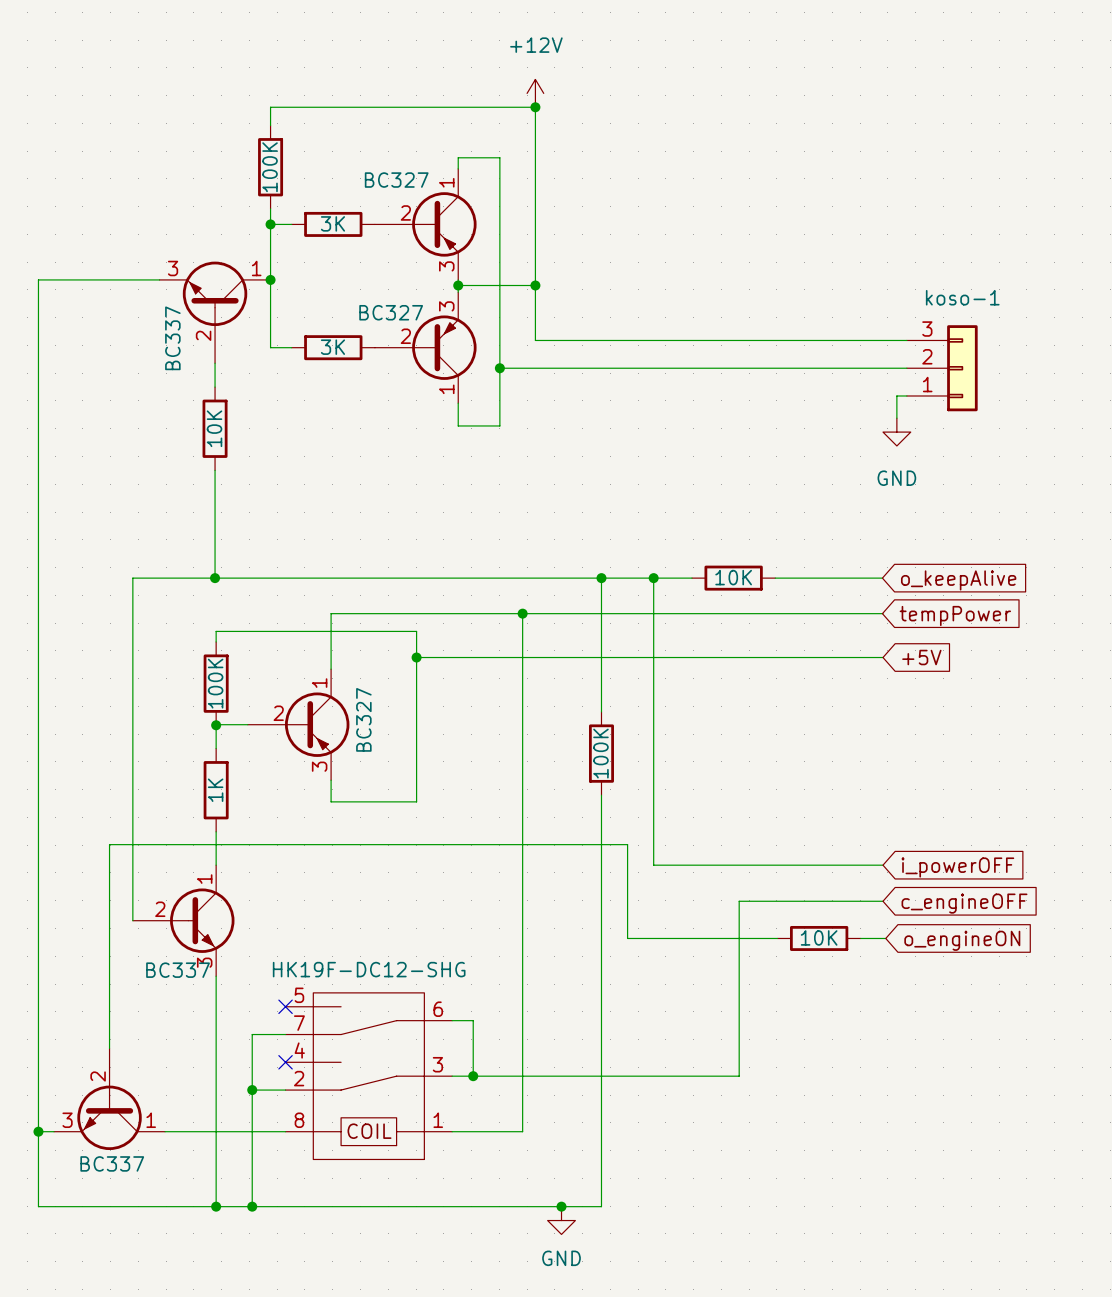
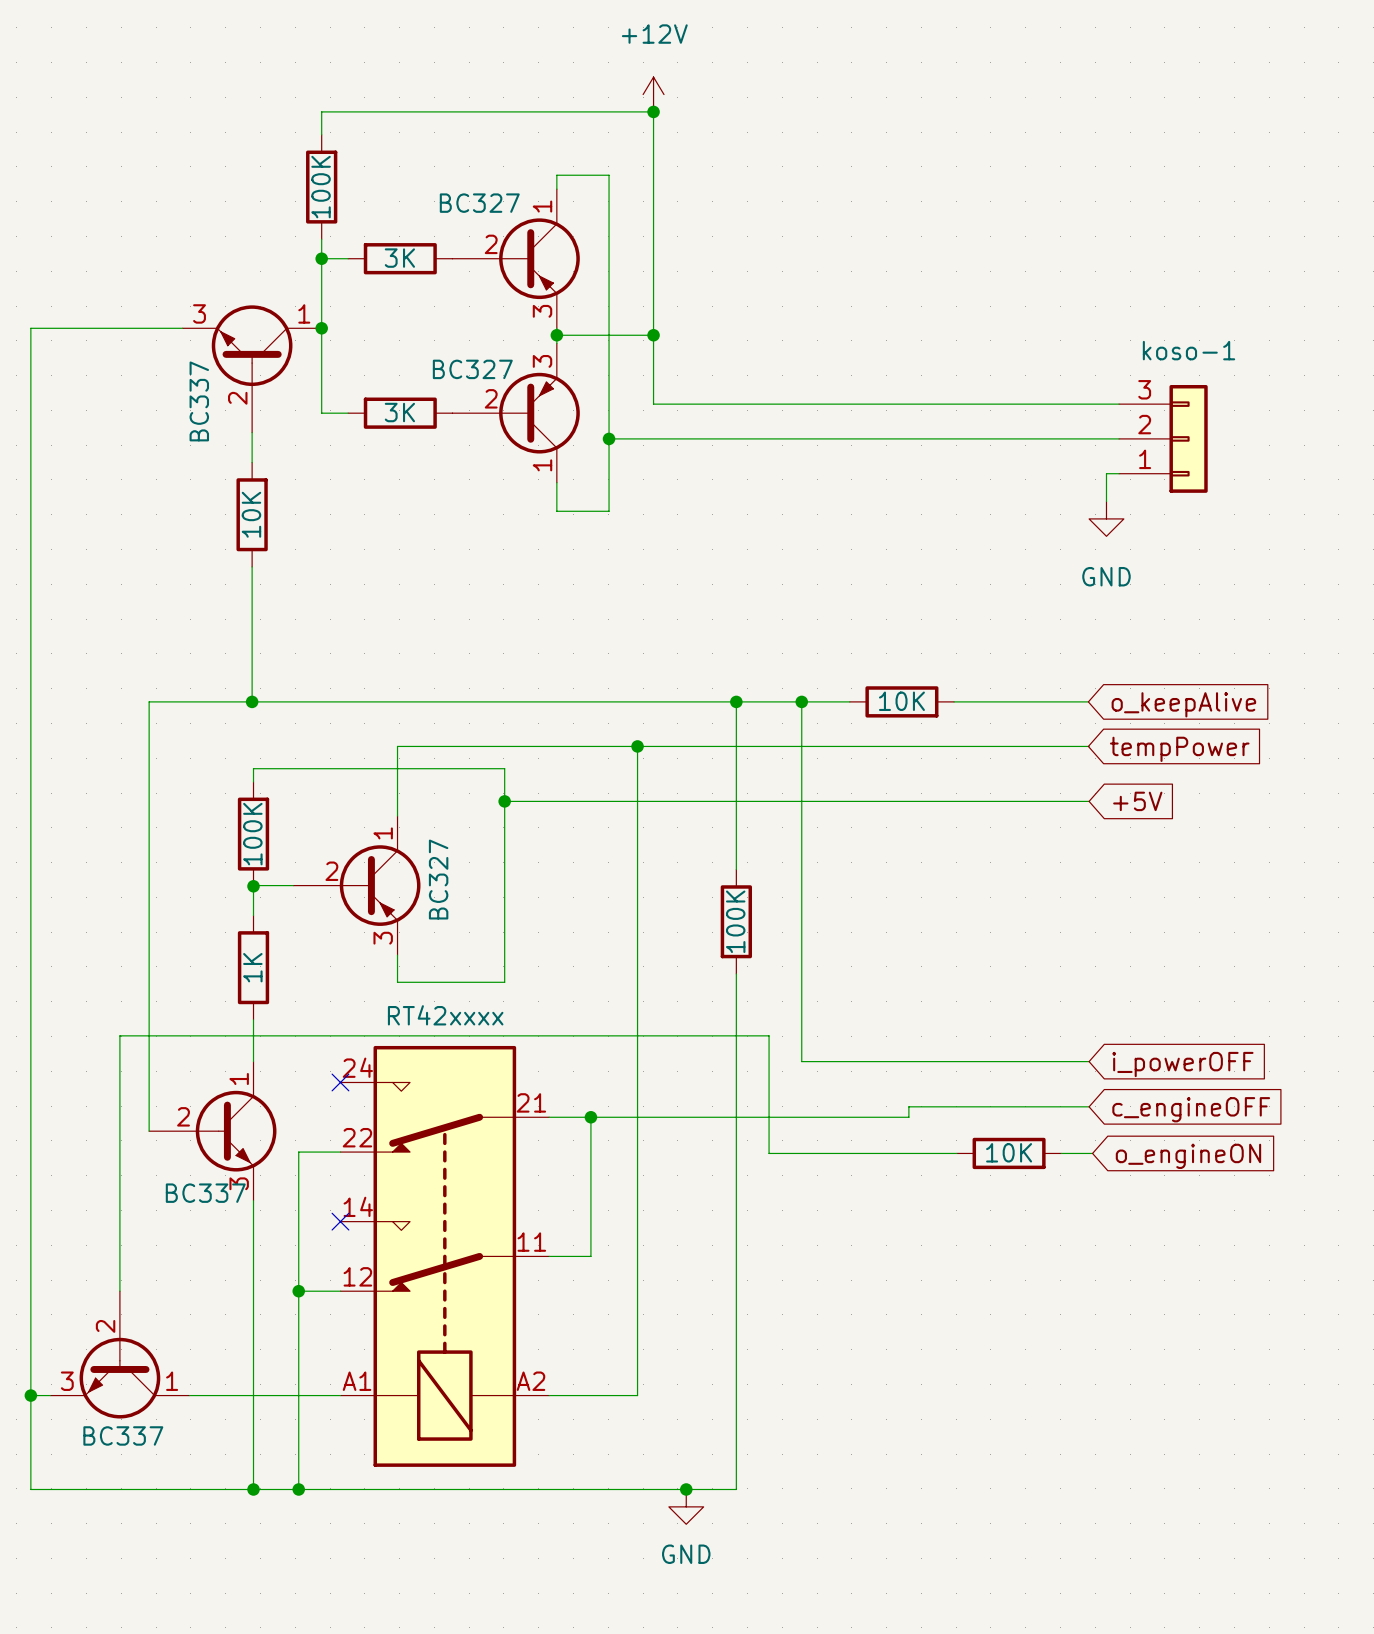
no-connect mark: none -> (340, 1082)
junction: none -> (590, 1117)
wire: (739, 909) (739, 1076) (452, 1076) -> (908, 1117) (549, 1117)
no-connect mark position: (285, 1006) -> (340, 1221)
part: none -> RT42xxxx (444, 1256)
wire: (473, 1020) (473, 1076) -> (575, 1256) (590, 1256) (590, 1116)
wire: (252, 1034) (285, 1034) -> (298, 1273) (298, 1152) (340, 1152)
no-connect mark: (285, 1062) -> none
part: HK19F-DC12-SHG (368, 1076) -> none
junction: (473, 1076) -> none
wire: (252, 1090) (285, 1090) -> (298, 1291) (340, 1291)
junction position: (252, 1090) -> (298, 1291)

